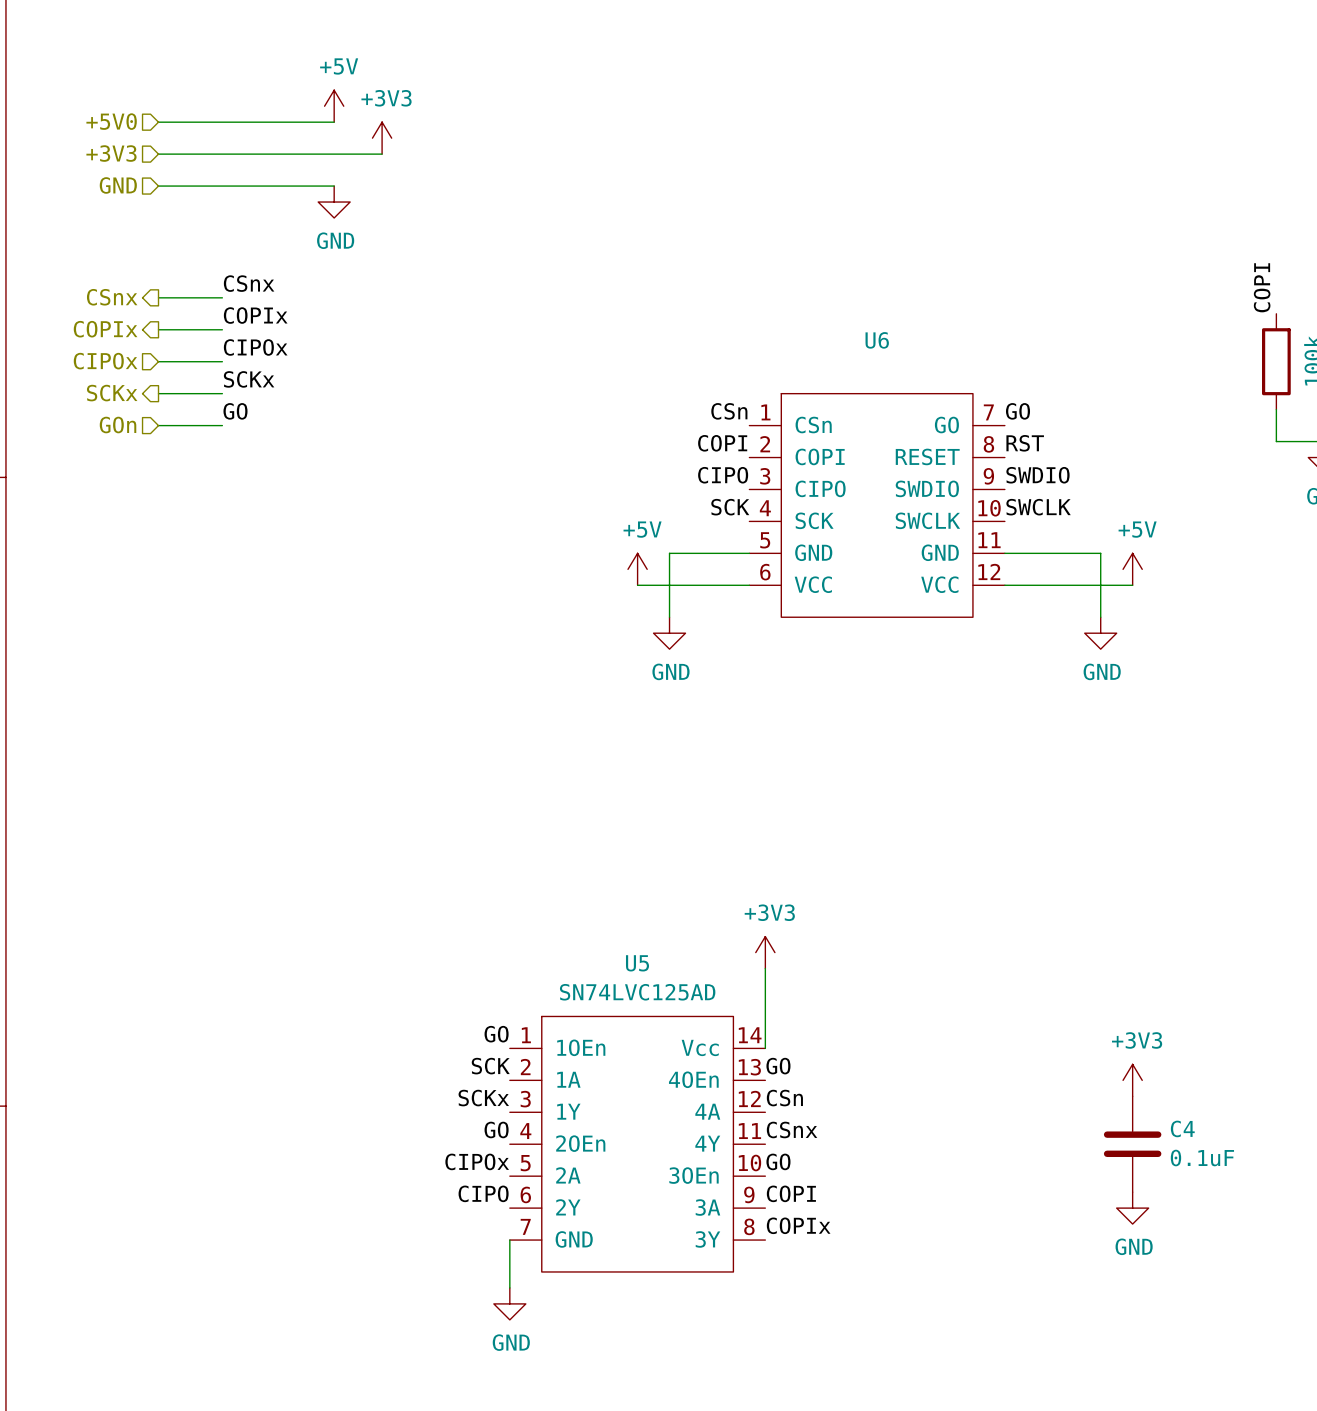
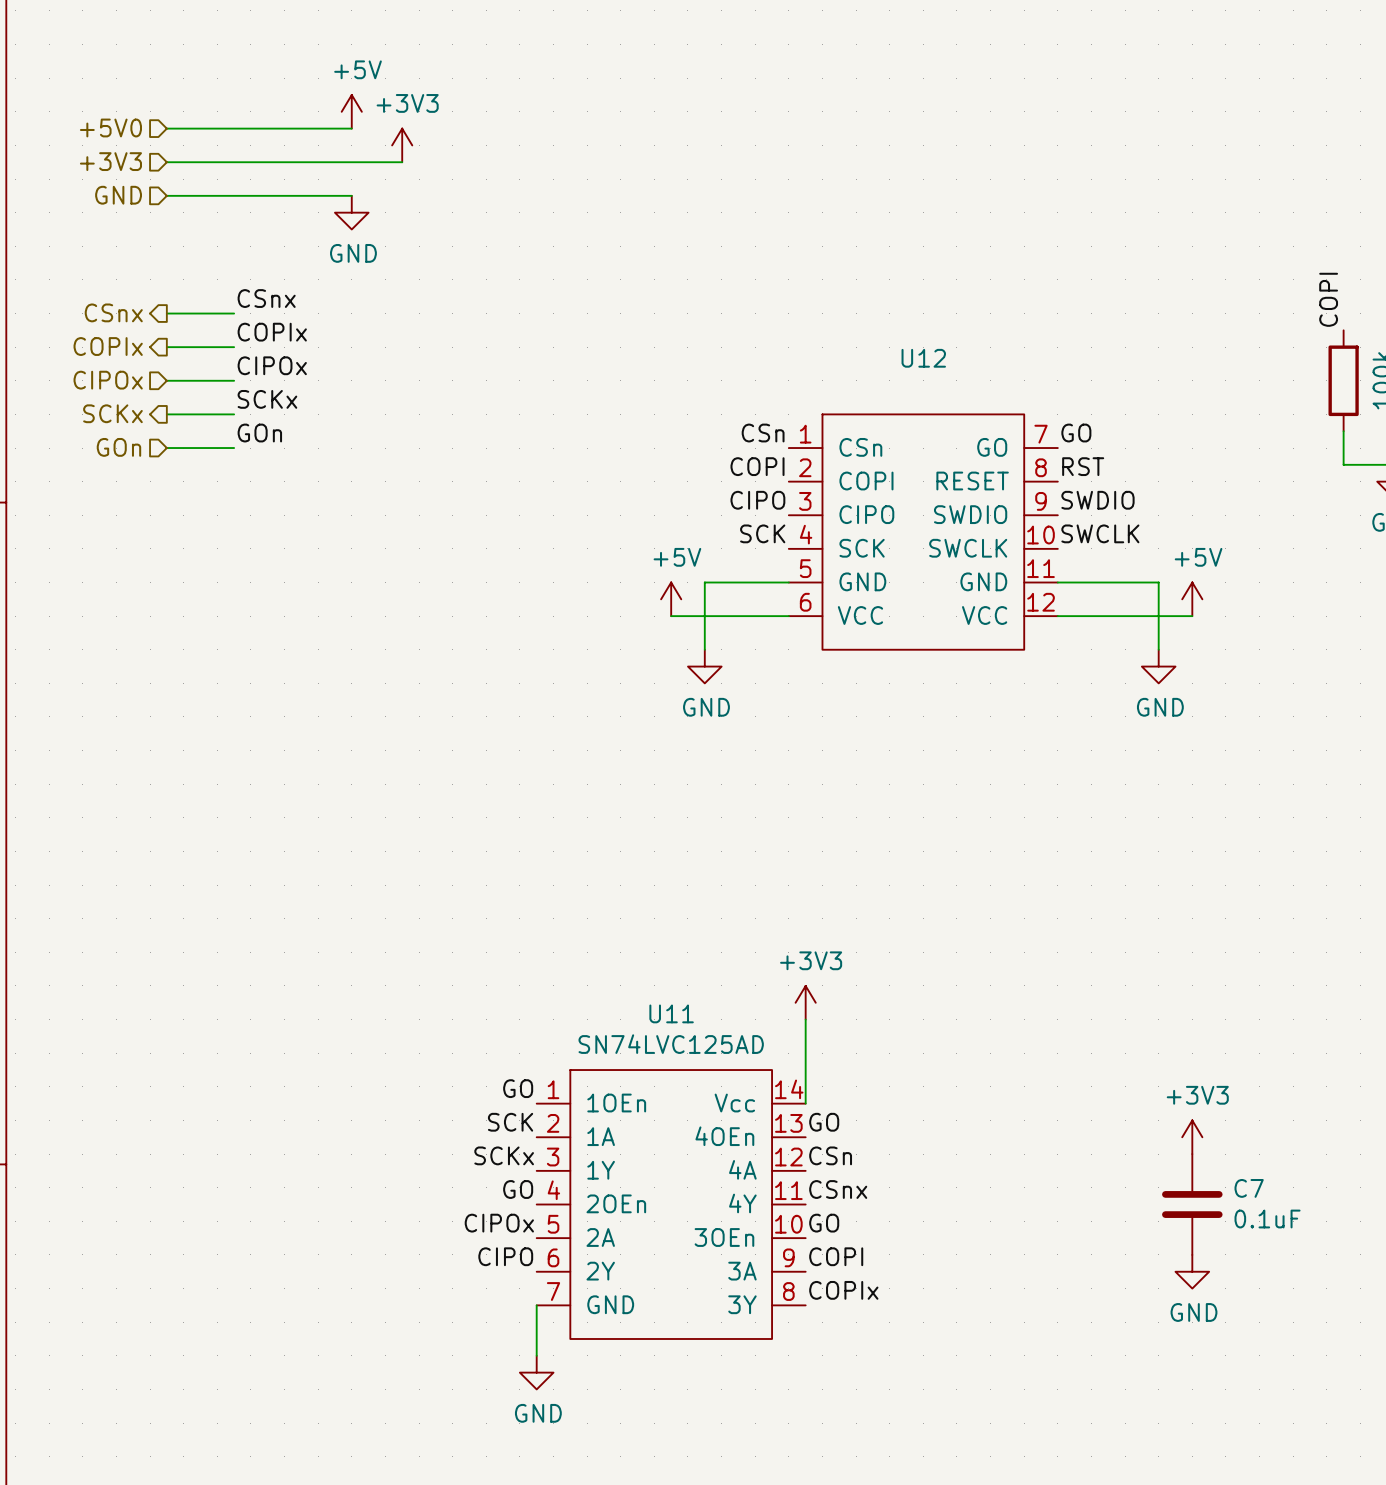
U6 name: U6 (877, 340) -> U12 (923, 358)
label: GO (235, 411) -> GOn (259, 433)
U5 name: U5 (637, 963) -> U11 (671, 1013)
C4 name: C4 (1182, 1128) -> C7 (1249, 1188)

